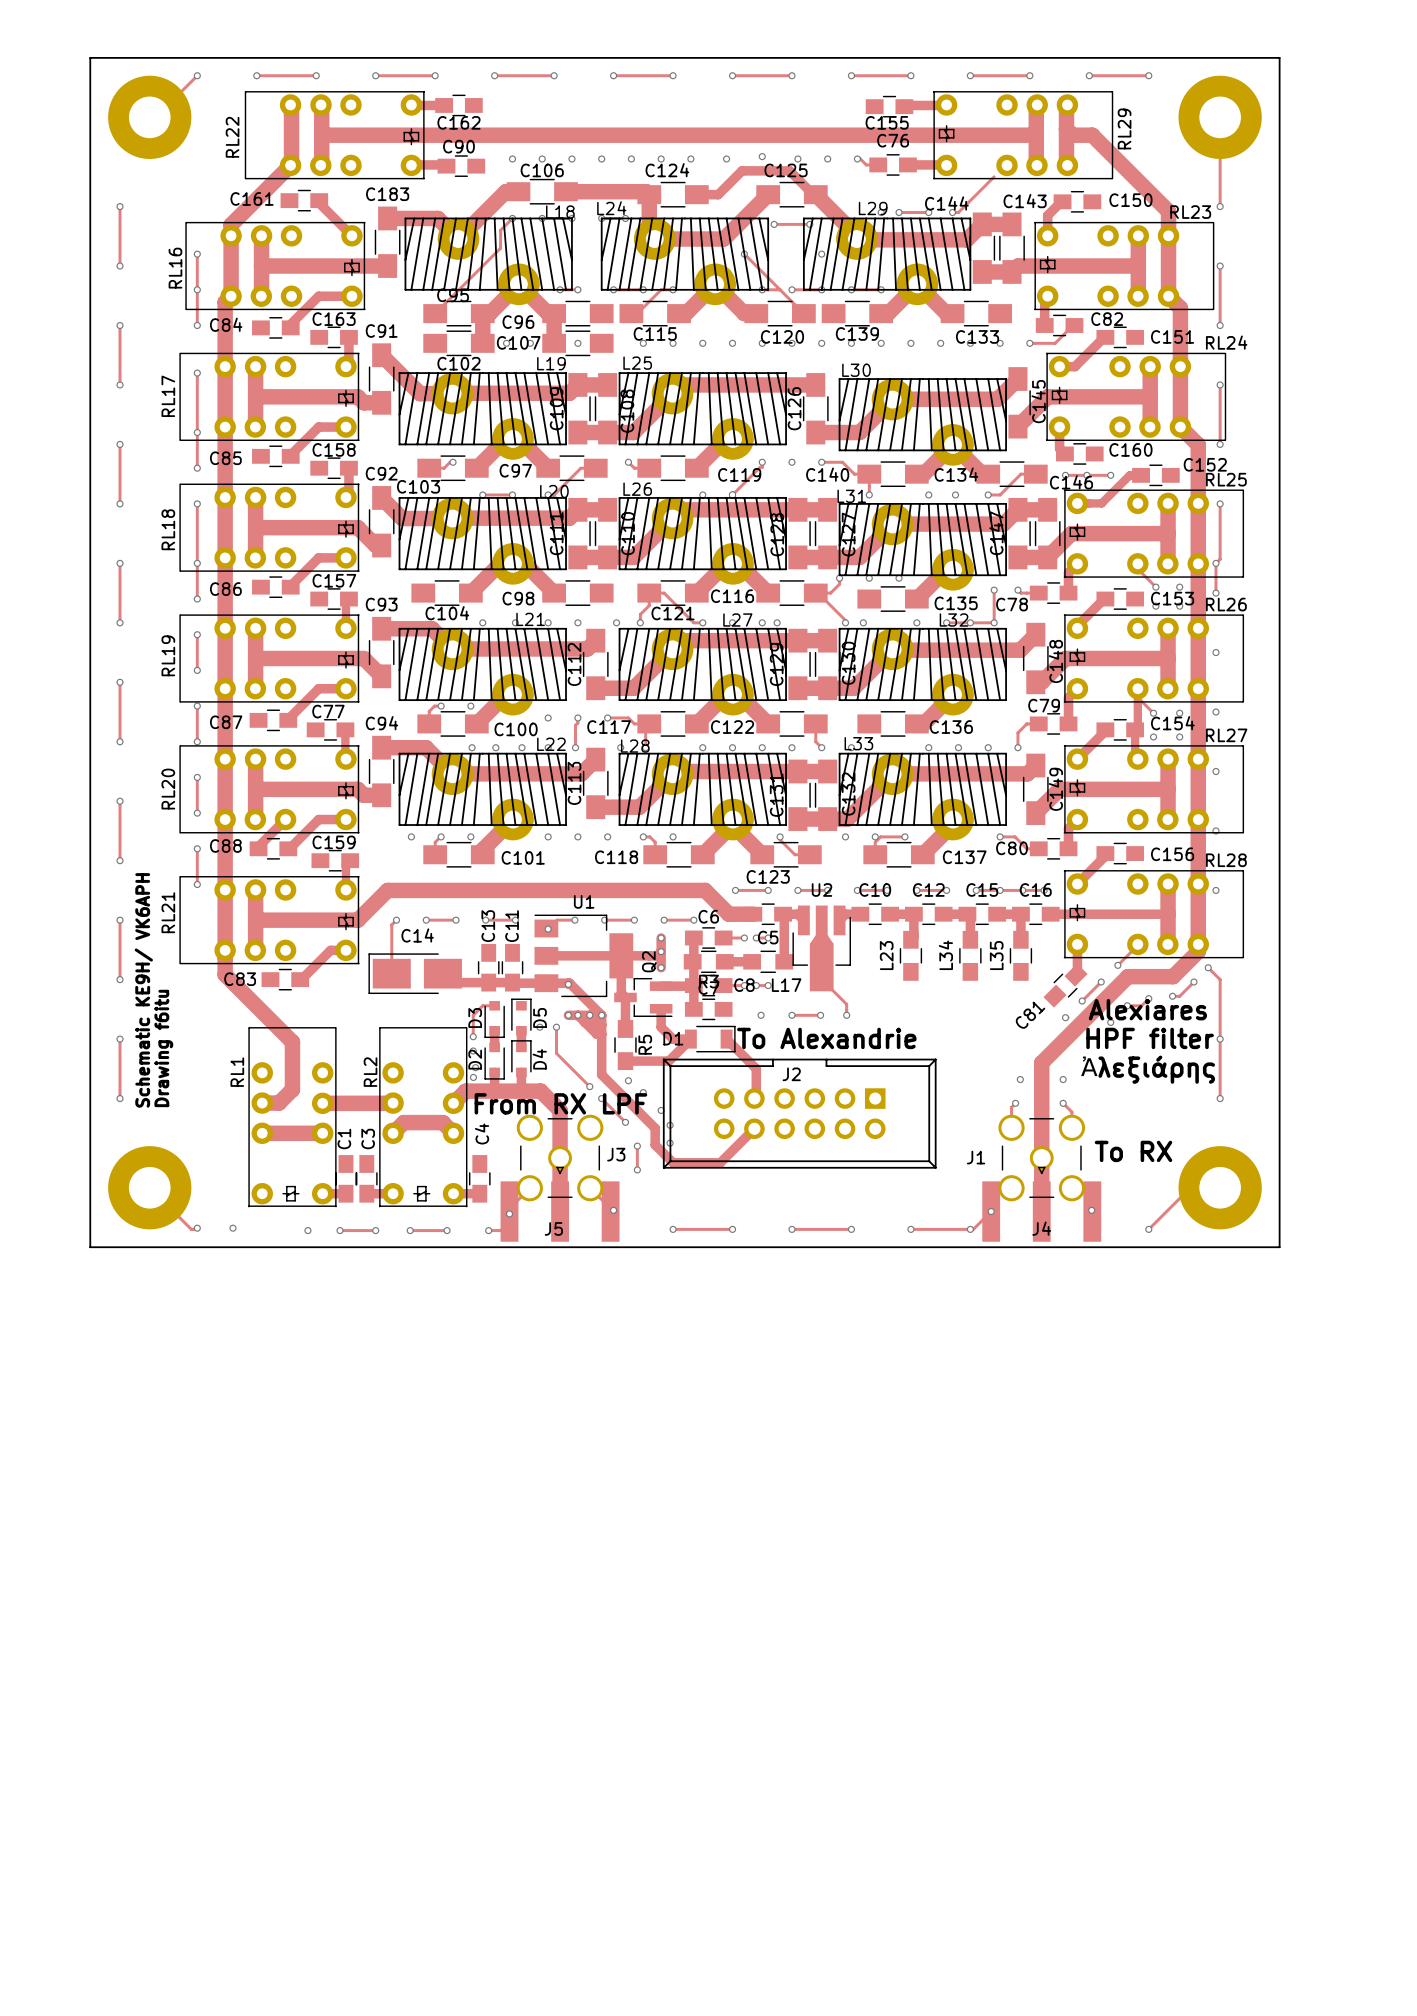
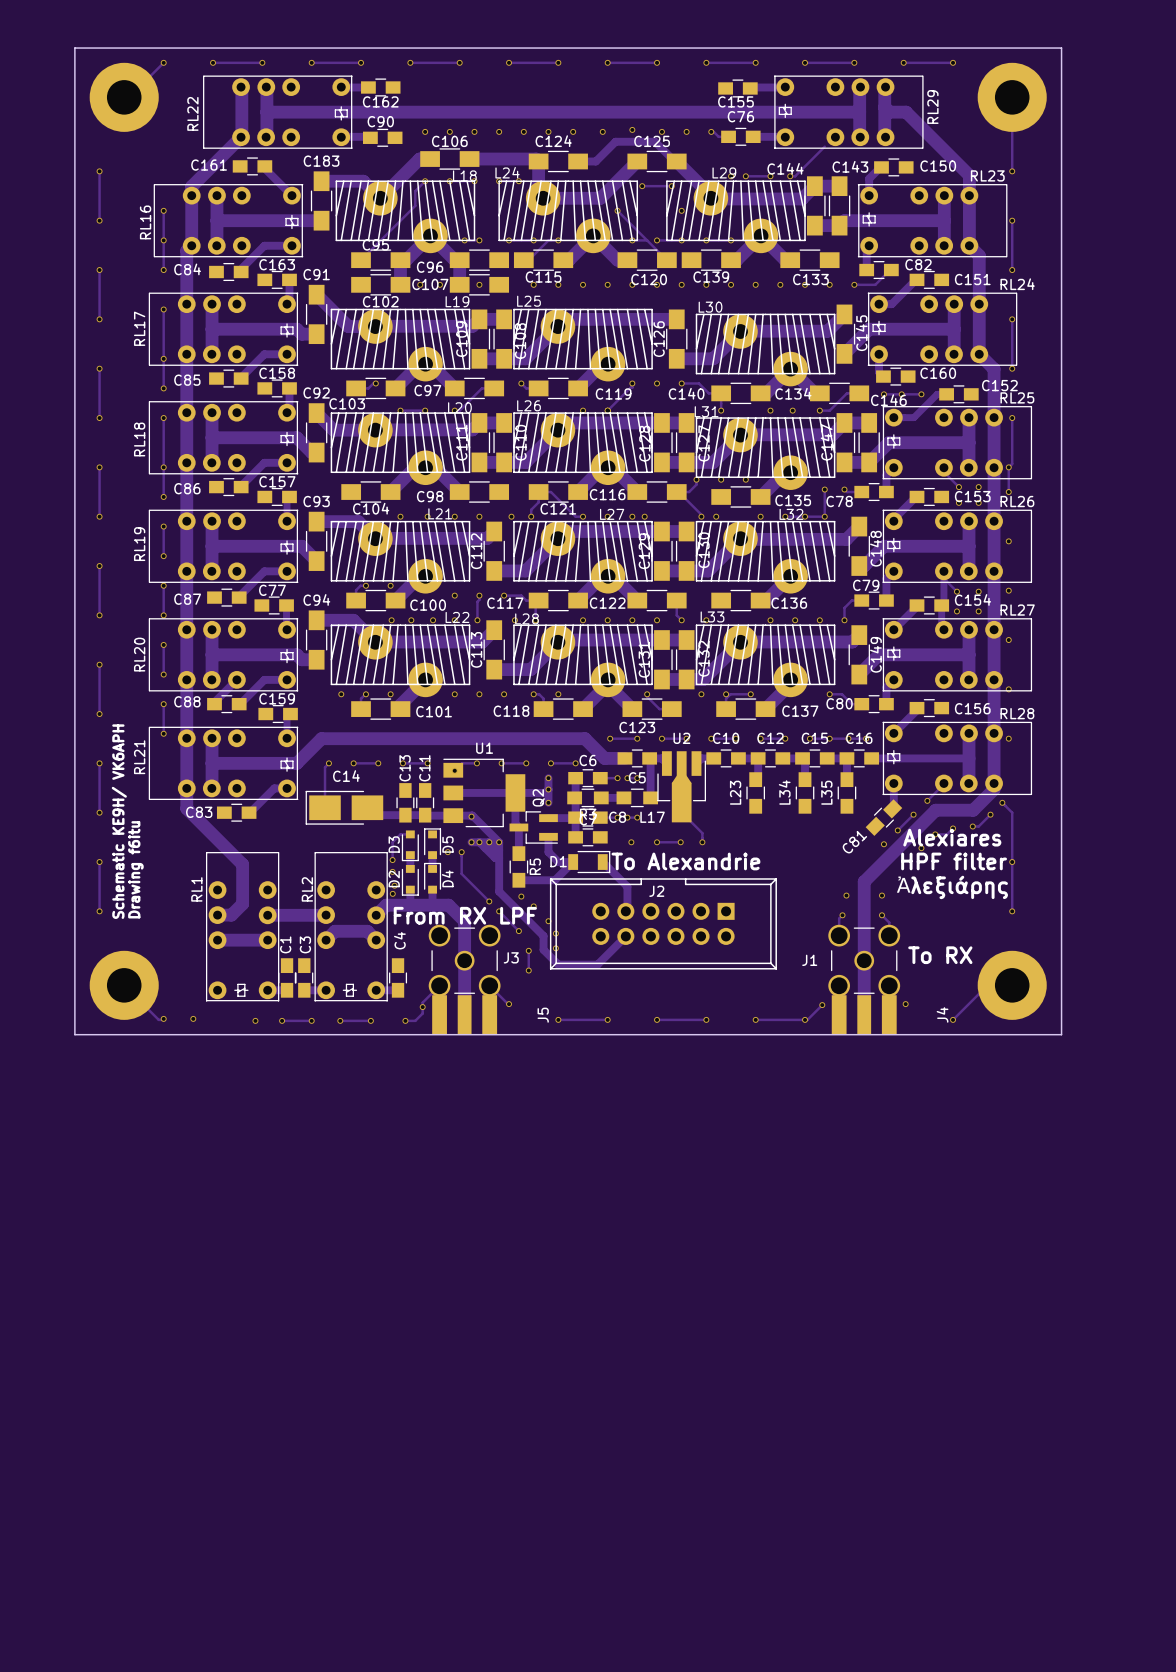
J5 footprint: [500, 1166, 620, 1242] -> [432, 995, 498, 1035]
J4 footprint: [982, 1166, 1102, 1242] -> [831, 995, 897, 1035]
J5 name position: J5 (553, 1228) -> J5 (543, 1015)
J4 name position: J4 (1041, 1228) -> J4 (942, 1014)

